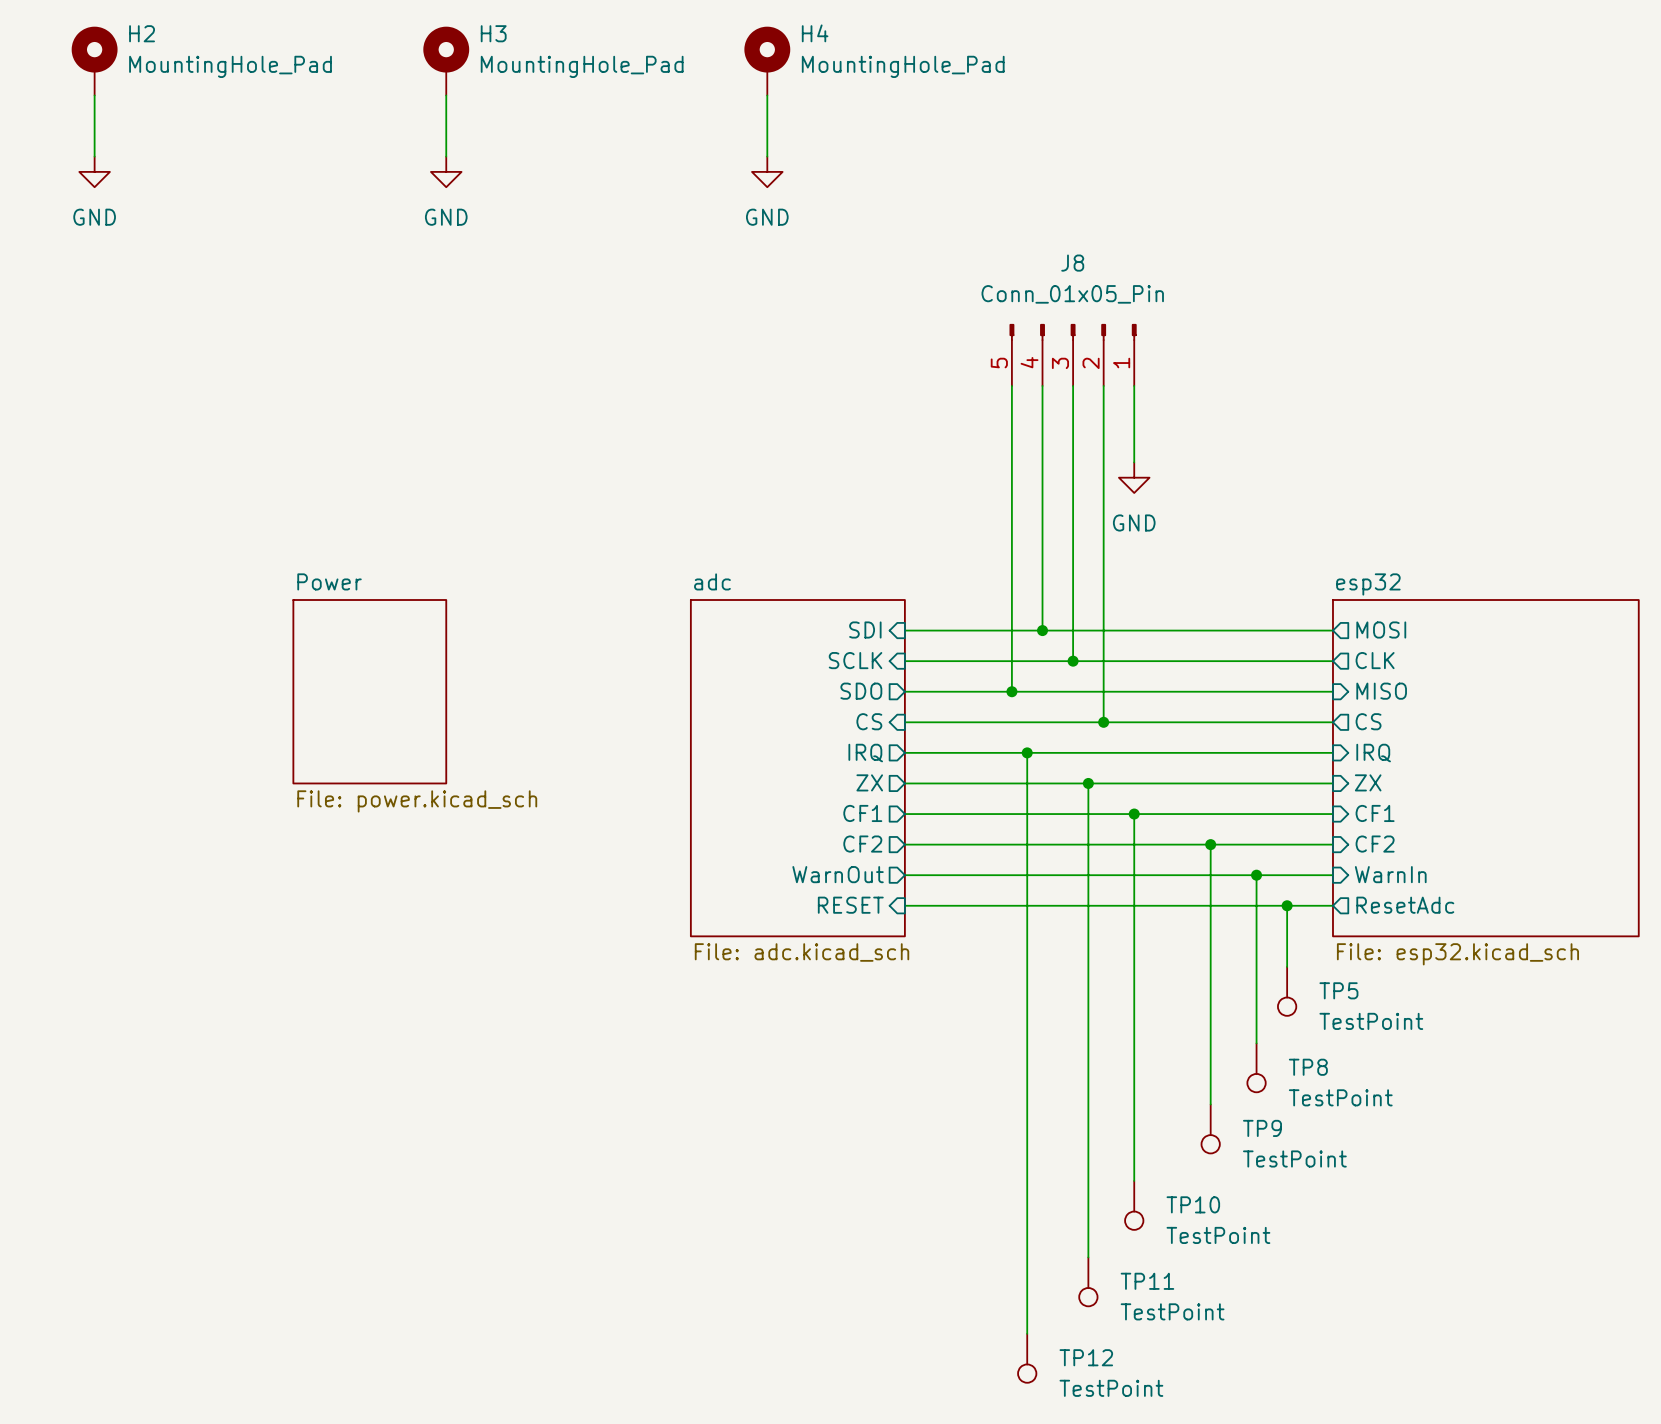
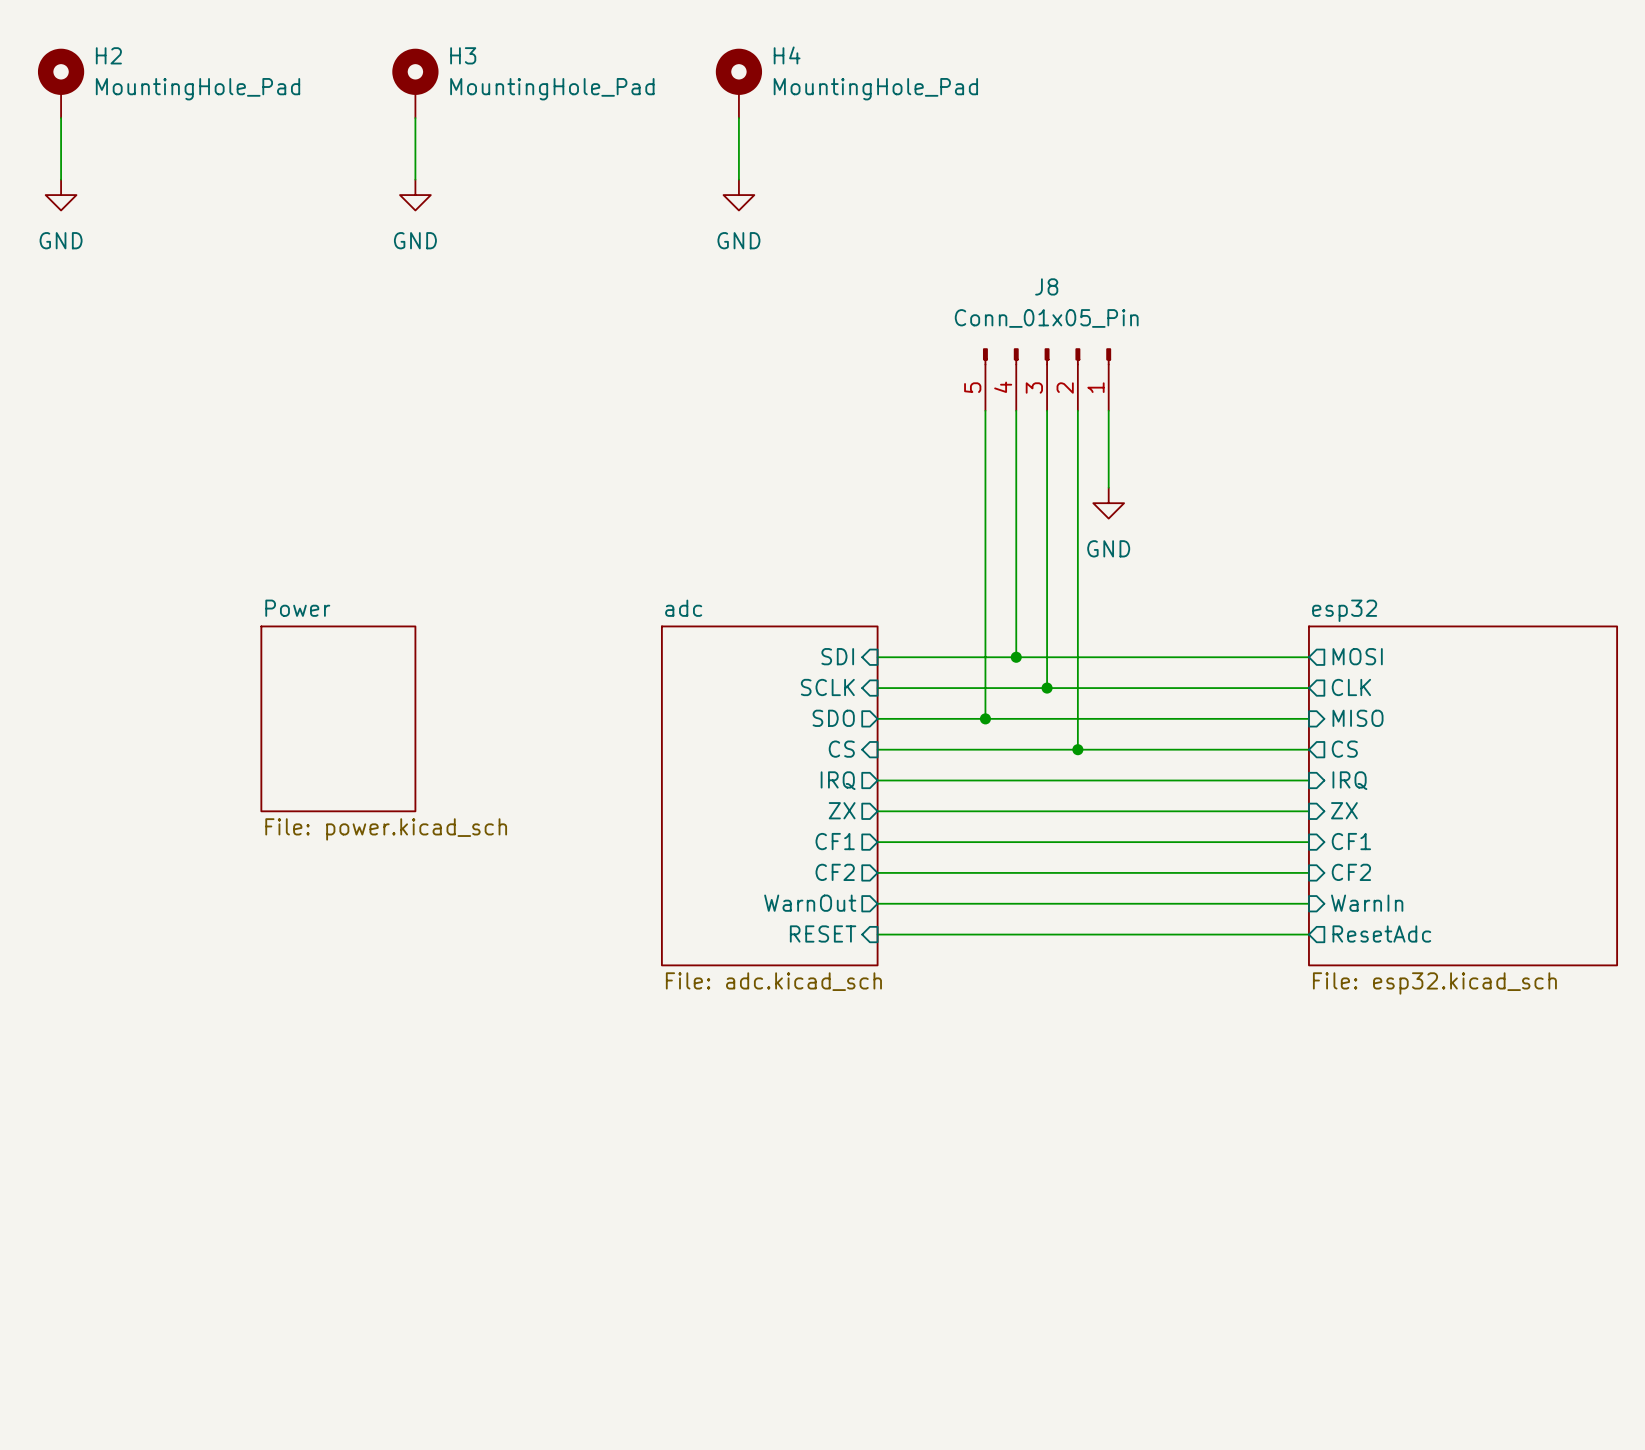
wire: (1027, 752) (1027, 1333) -> none
junction: (1027, 752) -> none
wire: (1088, 783) (1088, 1257) -> none
junction: (1088, 783) -> none
wire: (1134, 814) (1134, 1180) -> none
junction: (1134, 814) -> none
wire: (1210, 844) (1210, 1104) -> none
junction: (1210, 844) -> none
wire: (1256, 875) (1256, 1043) -> none
junction: (1256, 875) -> none
wire: (1287, 905) (1287, 966) -> none
junction: (1287, 905) -> none
TP5: TestPoint (1287, 991) -> none
TP8: TestPoint (1256, 1067) -> none
TP9: TestPoint (1210, 1128) -> none
TP10: TestPoint (1134, 1205) -> none
TP11: TestPoint (1088, 1281) -> none
TP12: TestPoint (1027, 1358) -> none

